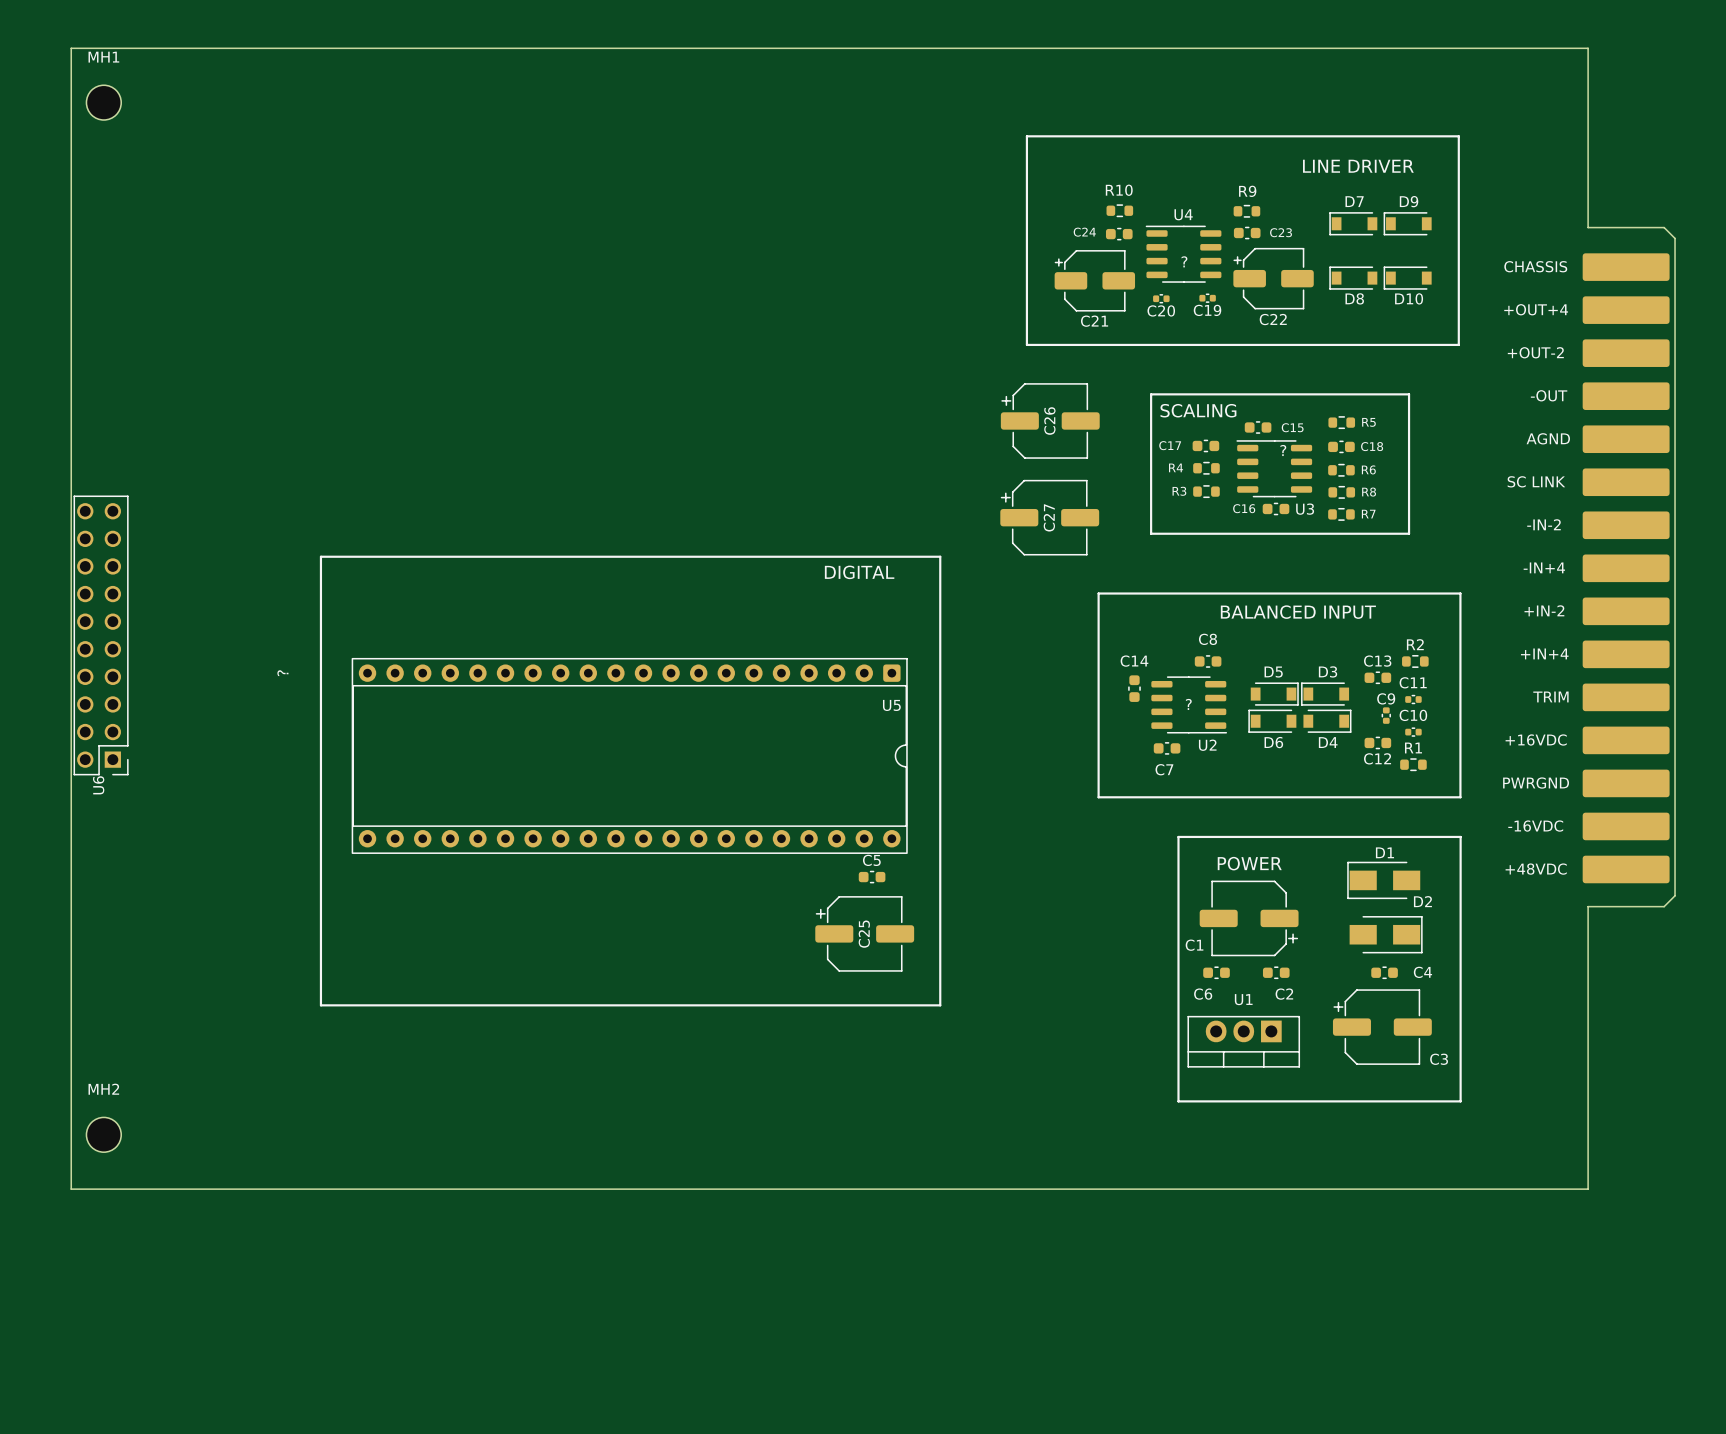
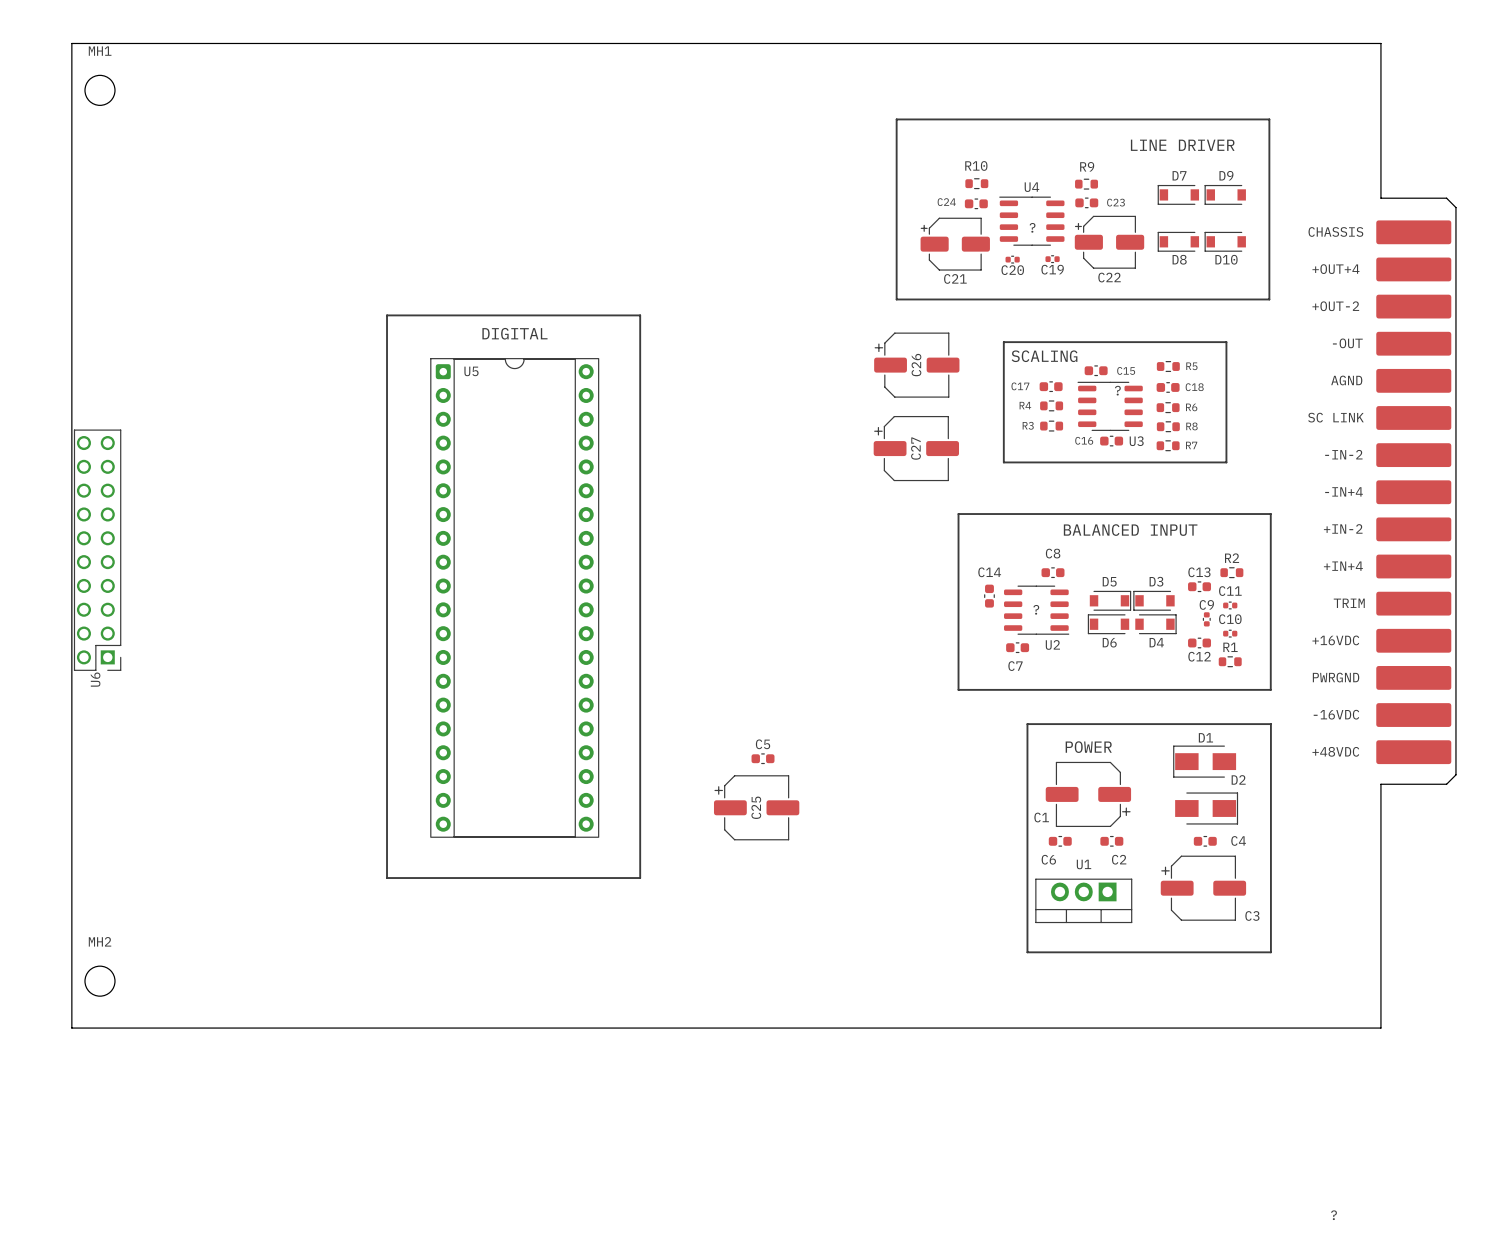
line: none -> (387, 315) (640, 315) (640, 878) (387, 878) (387, 315)
text: none -> DIGITAL (514, 333)
line: (320, 556) (940, 556) (940, 1005) (320, 1005) (320, 556) -> none
text: DIGITAL (859, 572) -> none
U5 value position: ? (282, 673) -> ? (1333, 1215)
U5 rotation: 0° (629, 755) -> 90° counterclockwise (514, 597)

